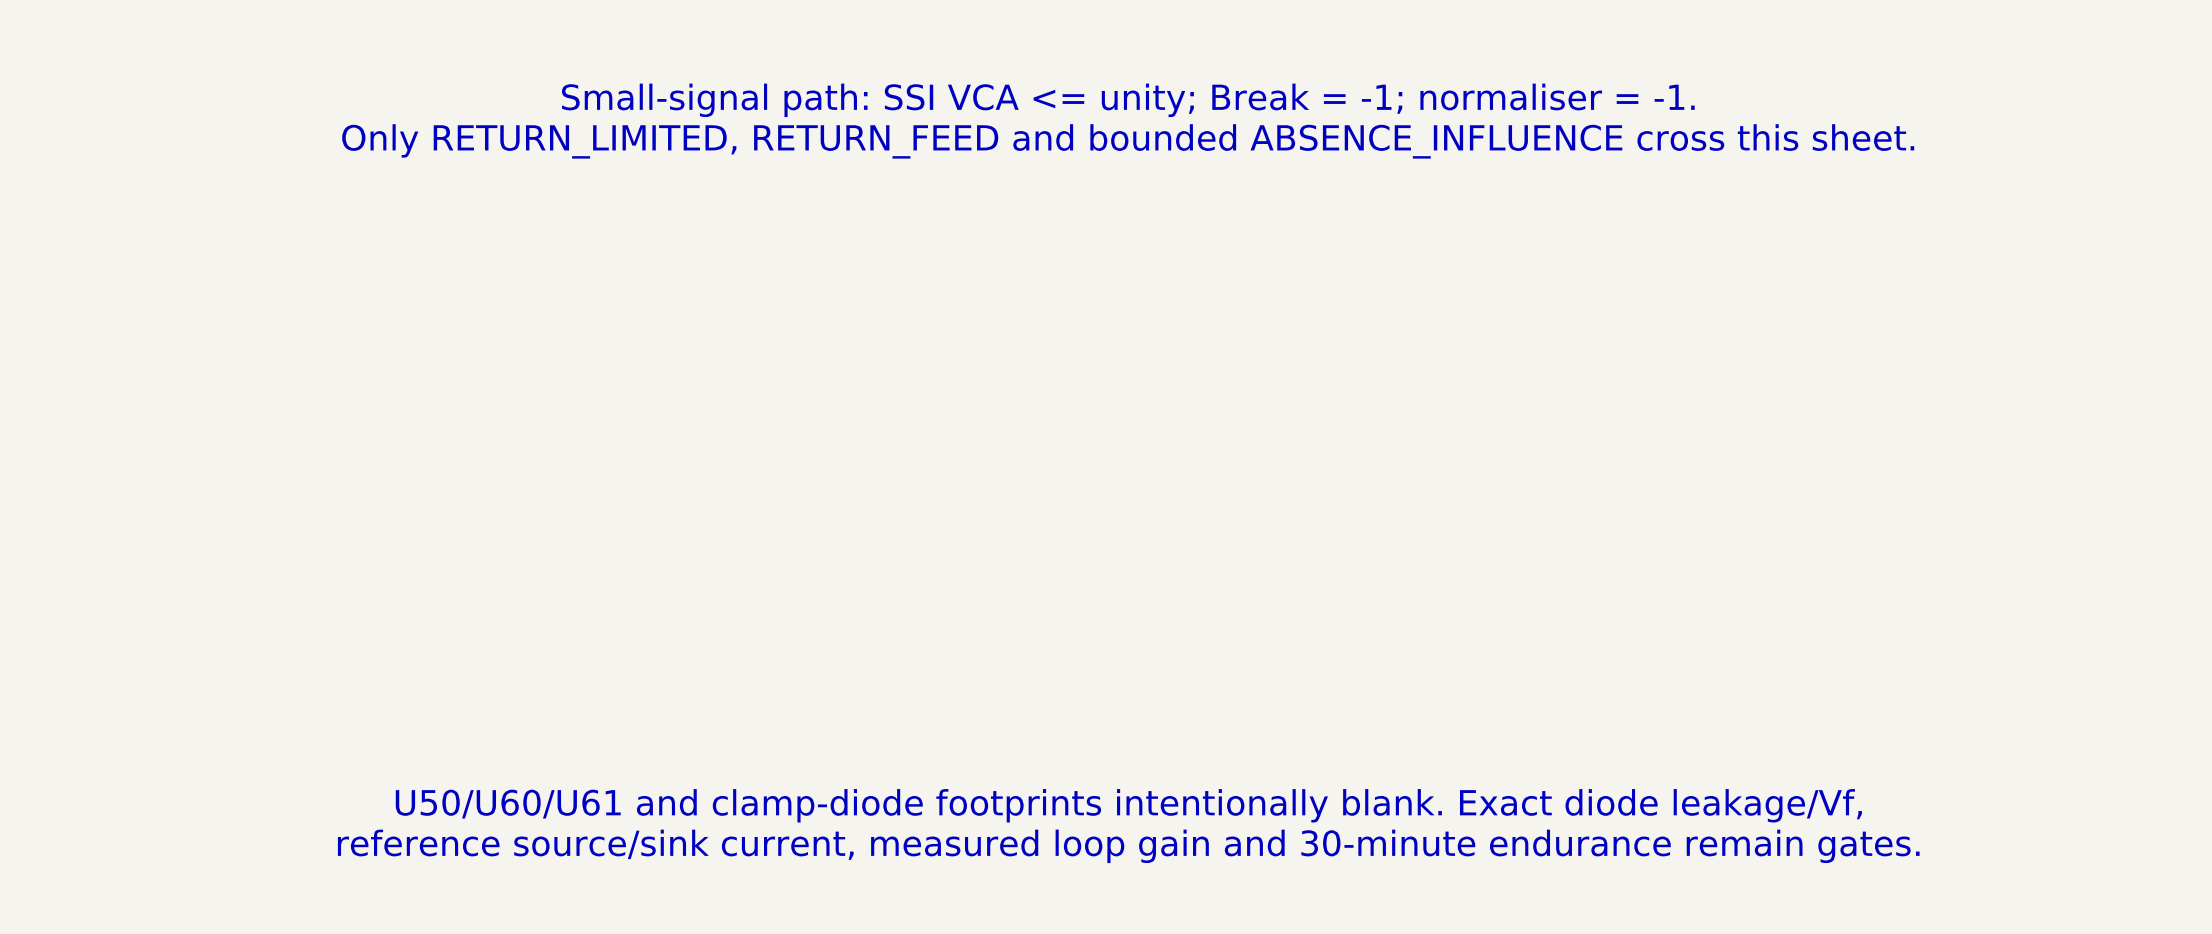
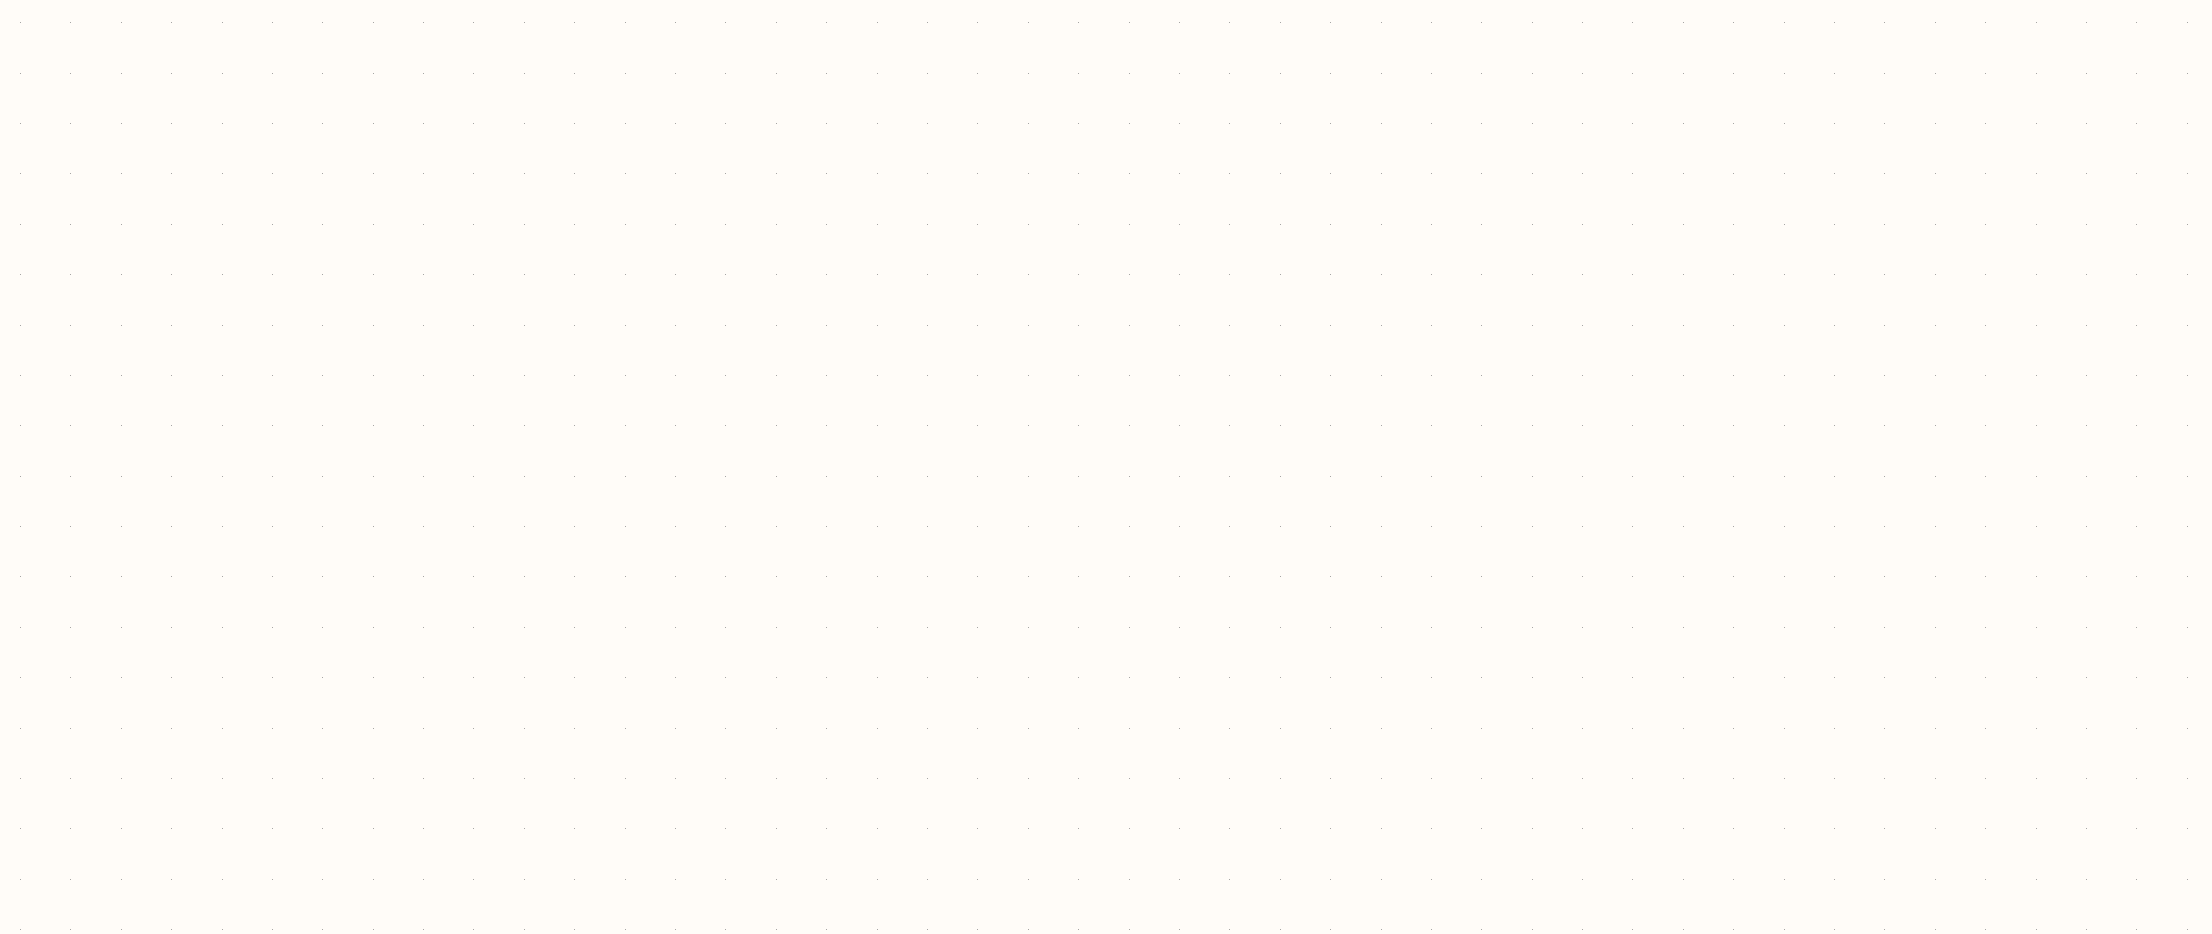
text: Small-signal path: SSI VCA <= unity; Break = -1; normaliser = -1. (1128, 100) -> none
text: Only RETURN_LIMITED, RETURN_FEED and bounded ABSENCE_INFLUENCE cross this sheet. (1128, 141) -> none
text: U50/U60/U61 and clamp-diode footprints intentionally blank. Exact diode leakage/Vf, (1128, 805) -> none
text: reference source/sink current, measured loop gain and 30-minute endurance remain gates. (1128, 846) -> none

